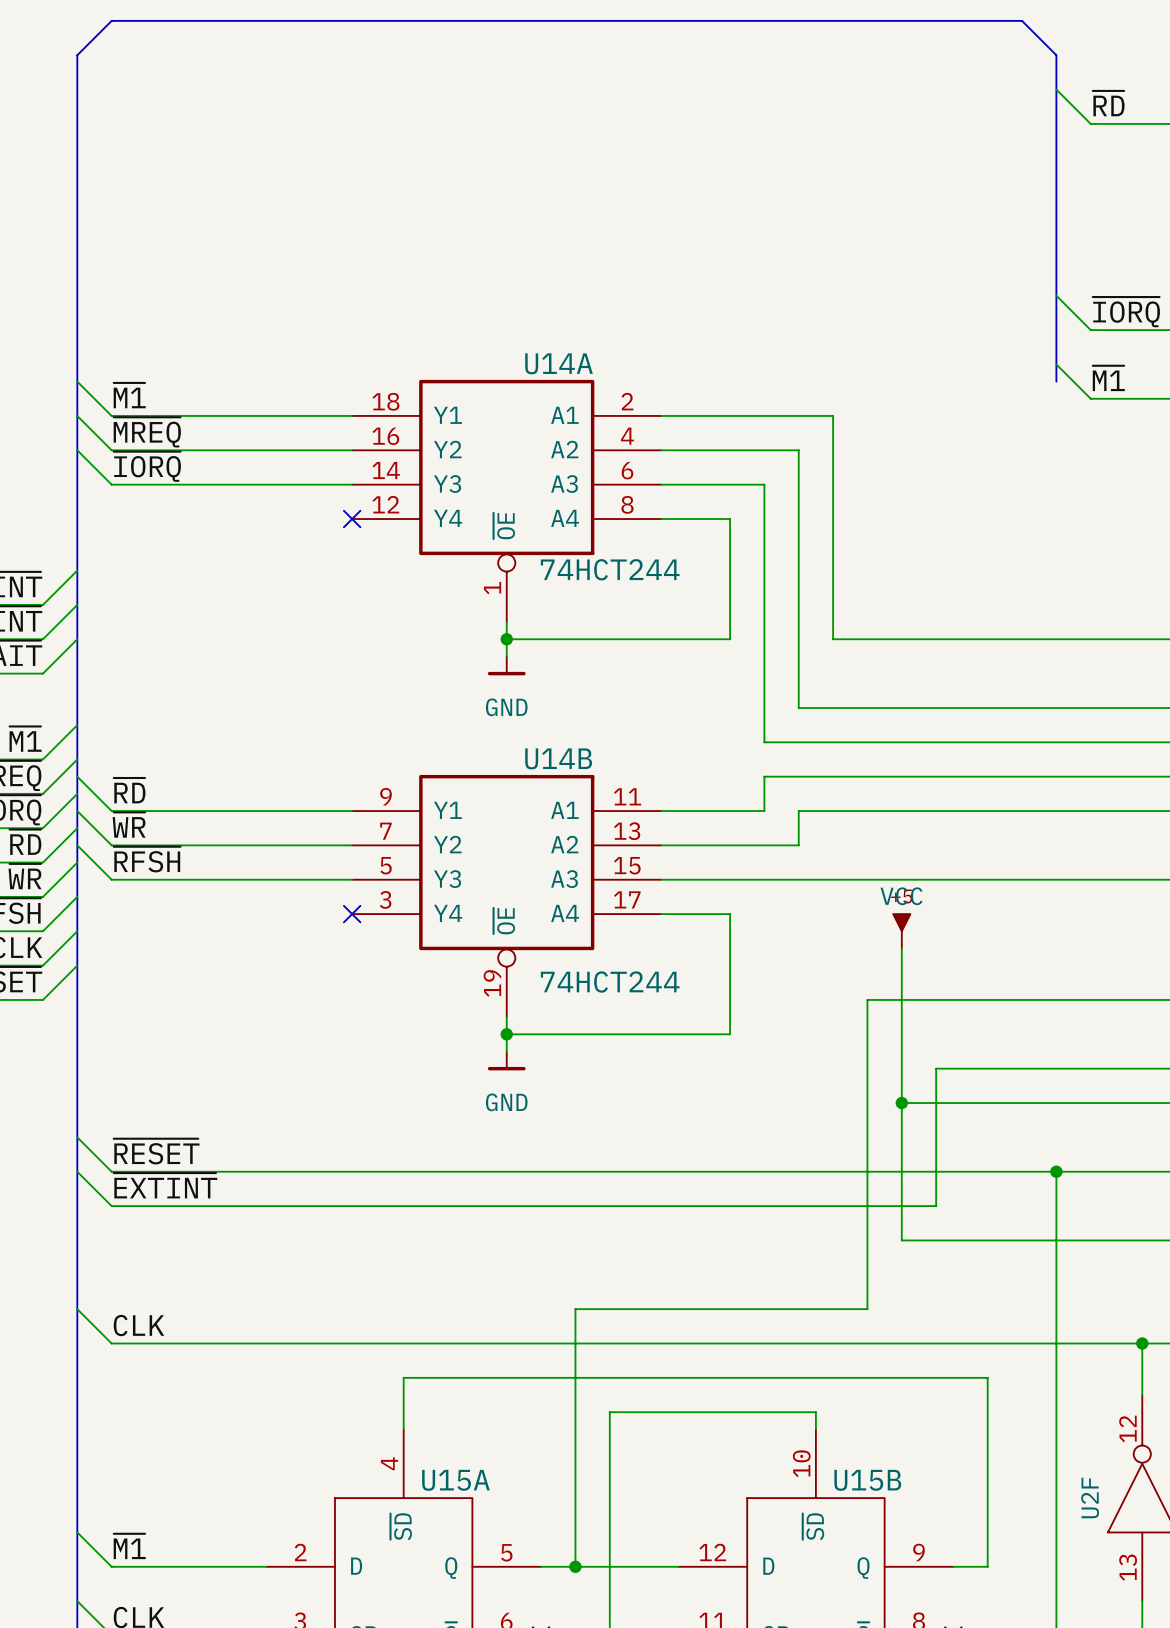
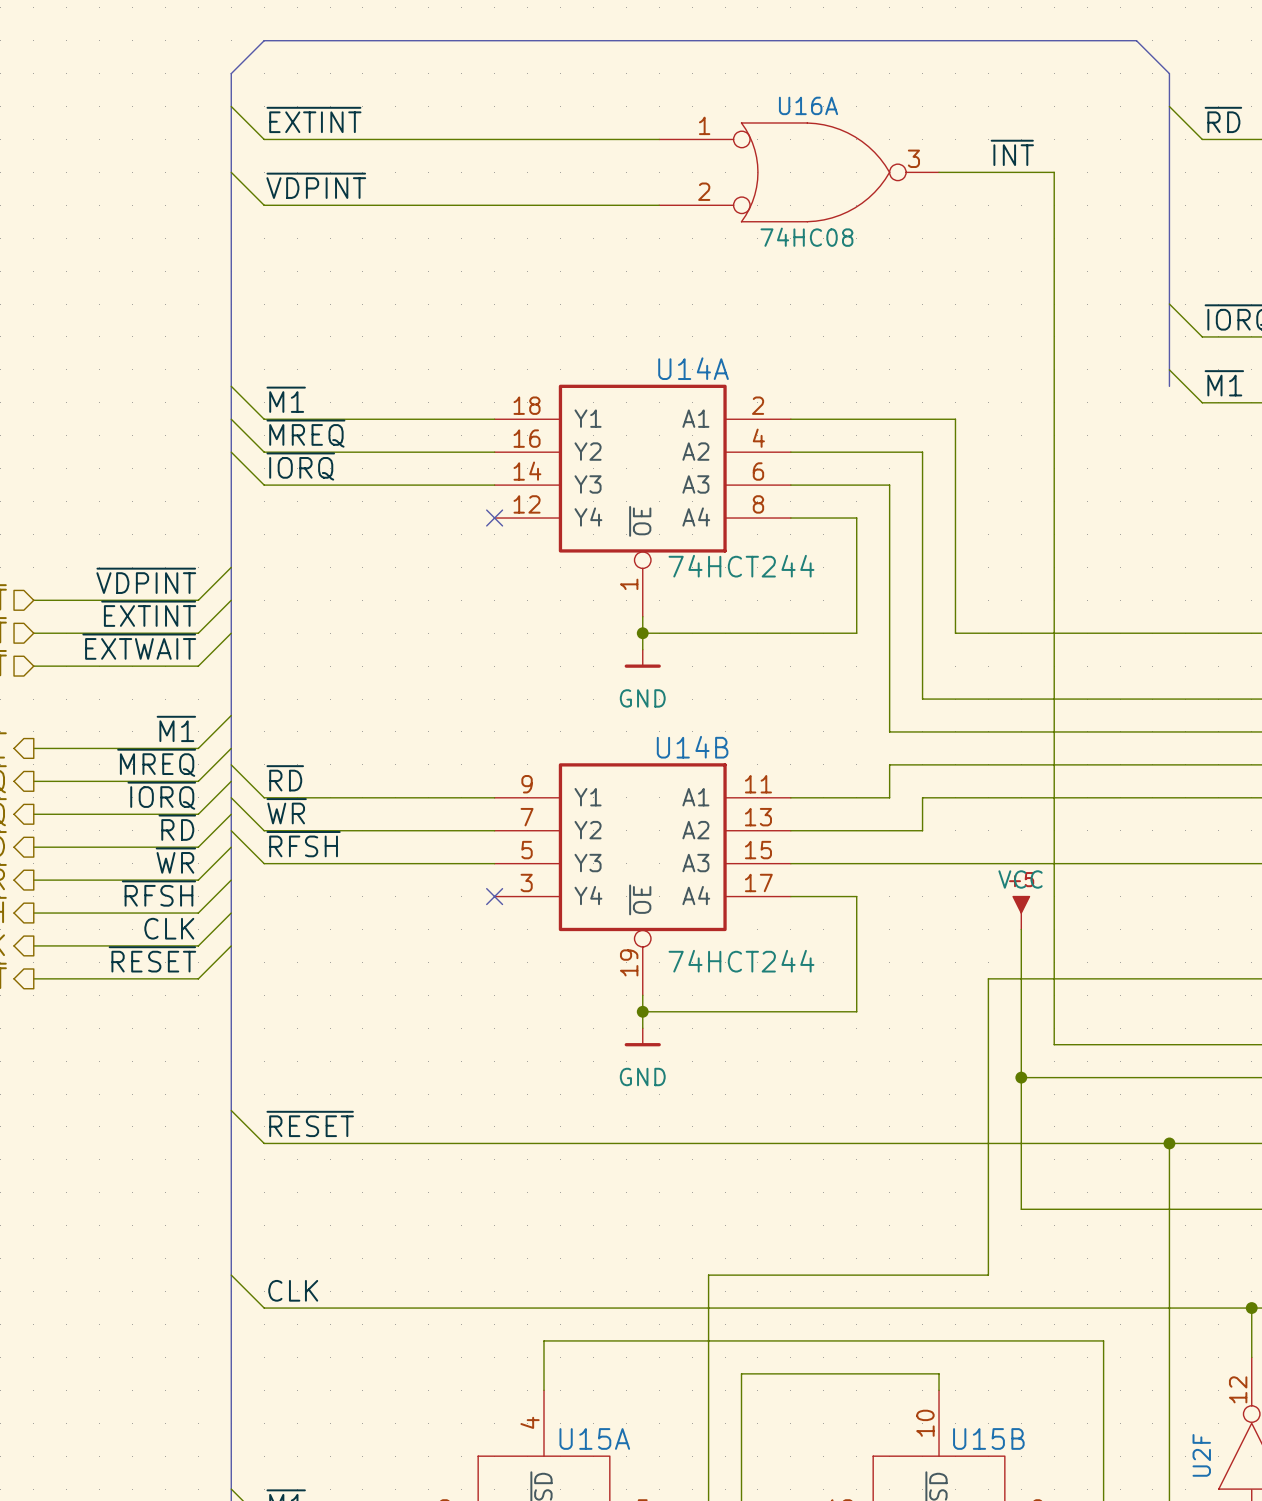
wire: none -> (231, 106) (264, 139) (659, 139)
label: none -> ~{EXTINT} (313, 119)
label: none -> ~{INT} (1012, 152)
wire: none -> (231, 172) (264, 205) (659, 205)
U16A: none -> 74HC08 (799, 172)
label: none -> ~{VDPINT} (316, 185)
wire: (936, 1068) (936, 1206) (111, 1206) (77, 1171) -> (1054, 1044) (1054, 172) (939, 172)
label: ~{EXTINT} (165, 1185) -> none

